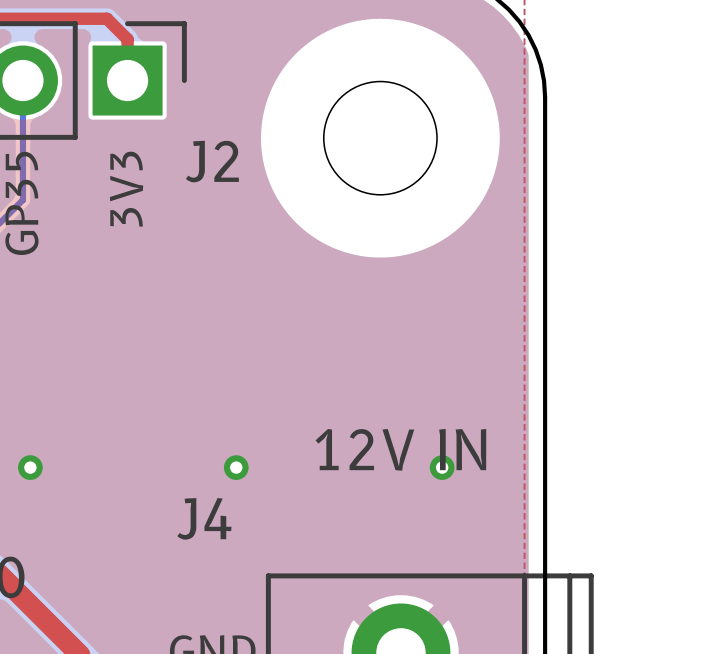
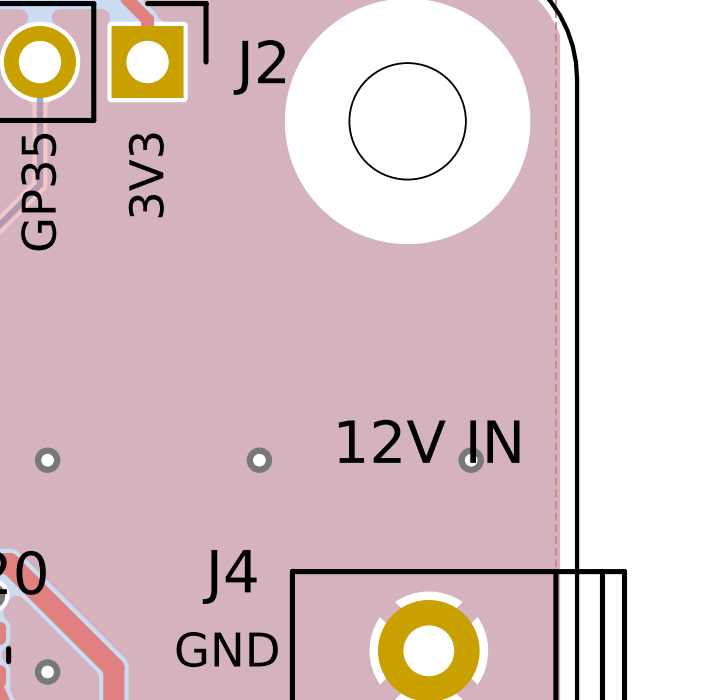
J2 name position: J2 (212, 161) -> J2 (259, 67)
J4 name position: J4 (204, 518) -> J4 (229, 576)

